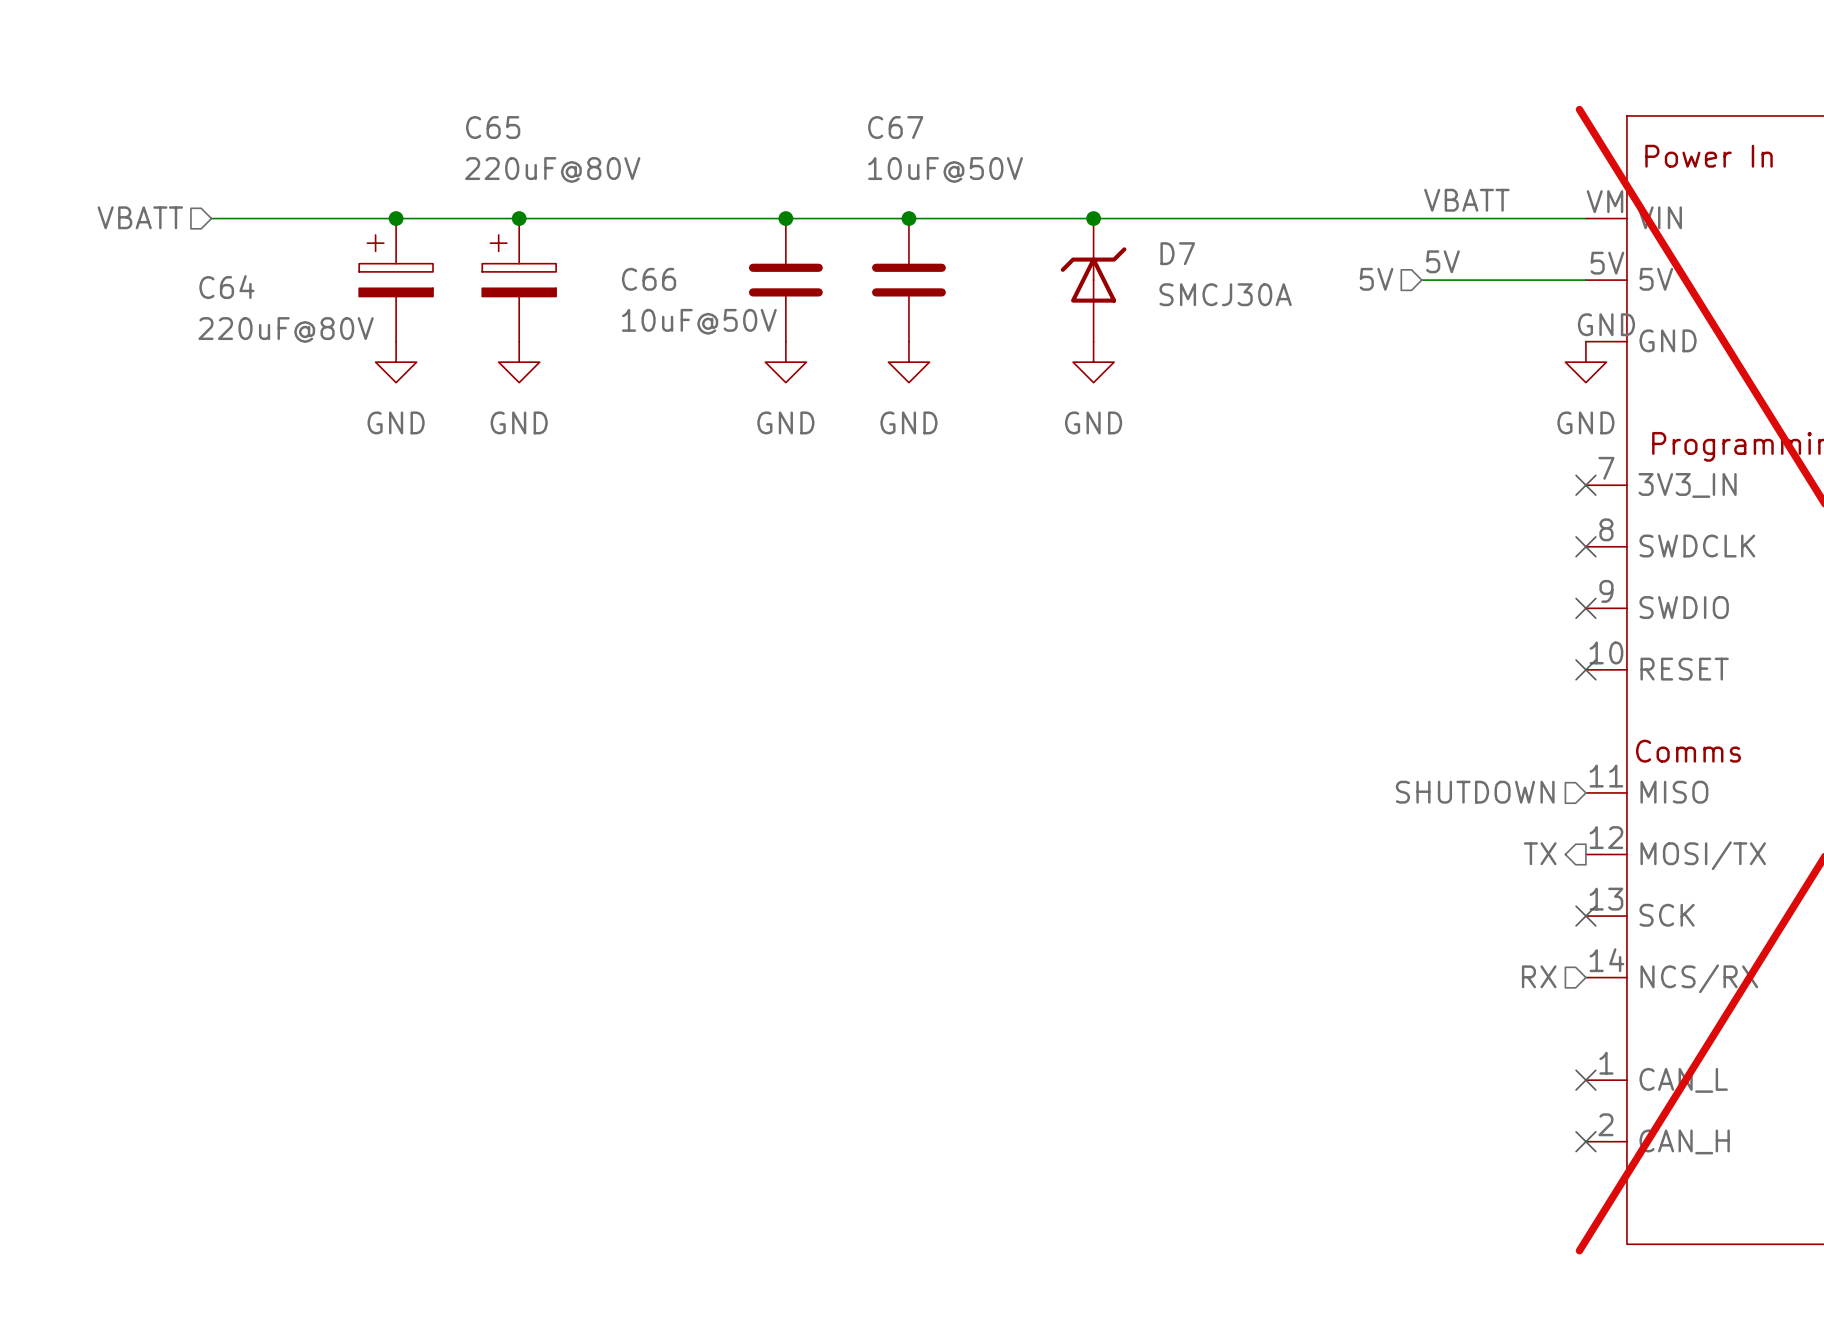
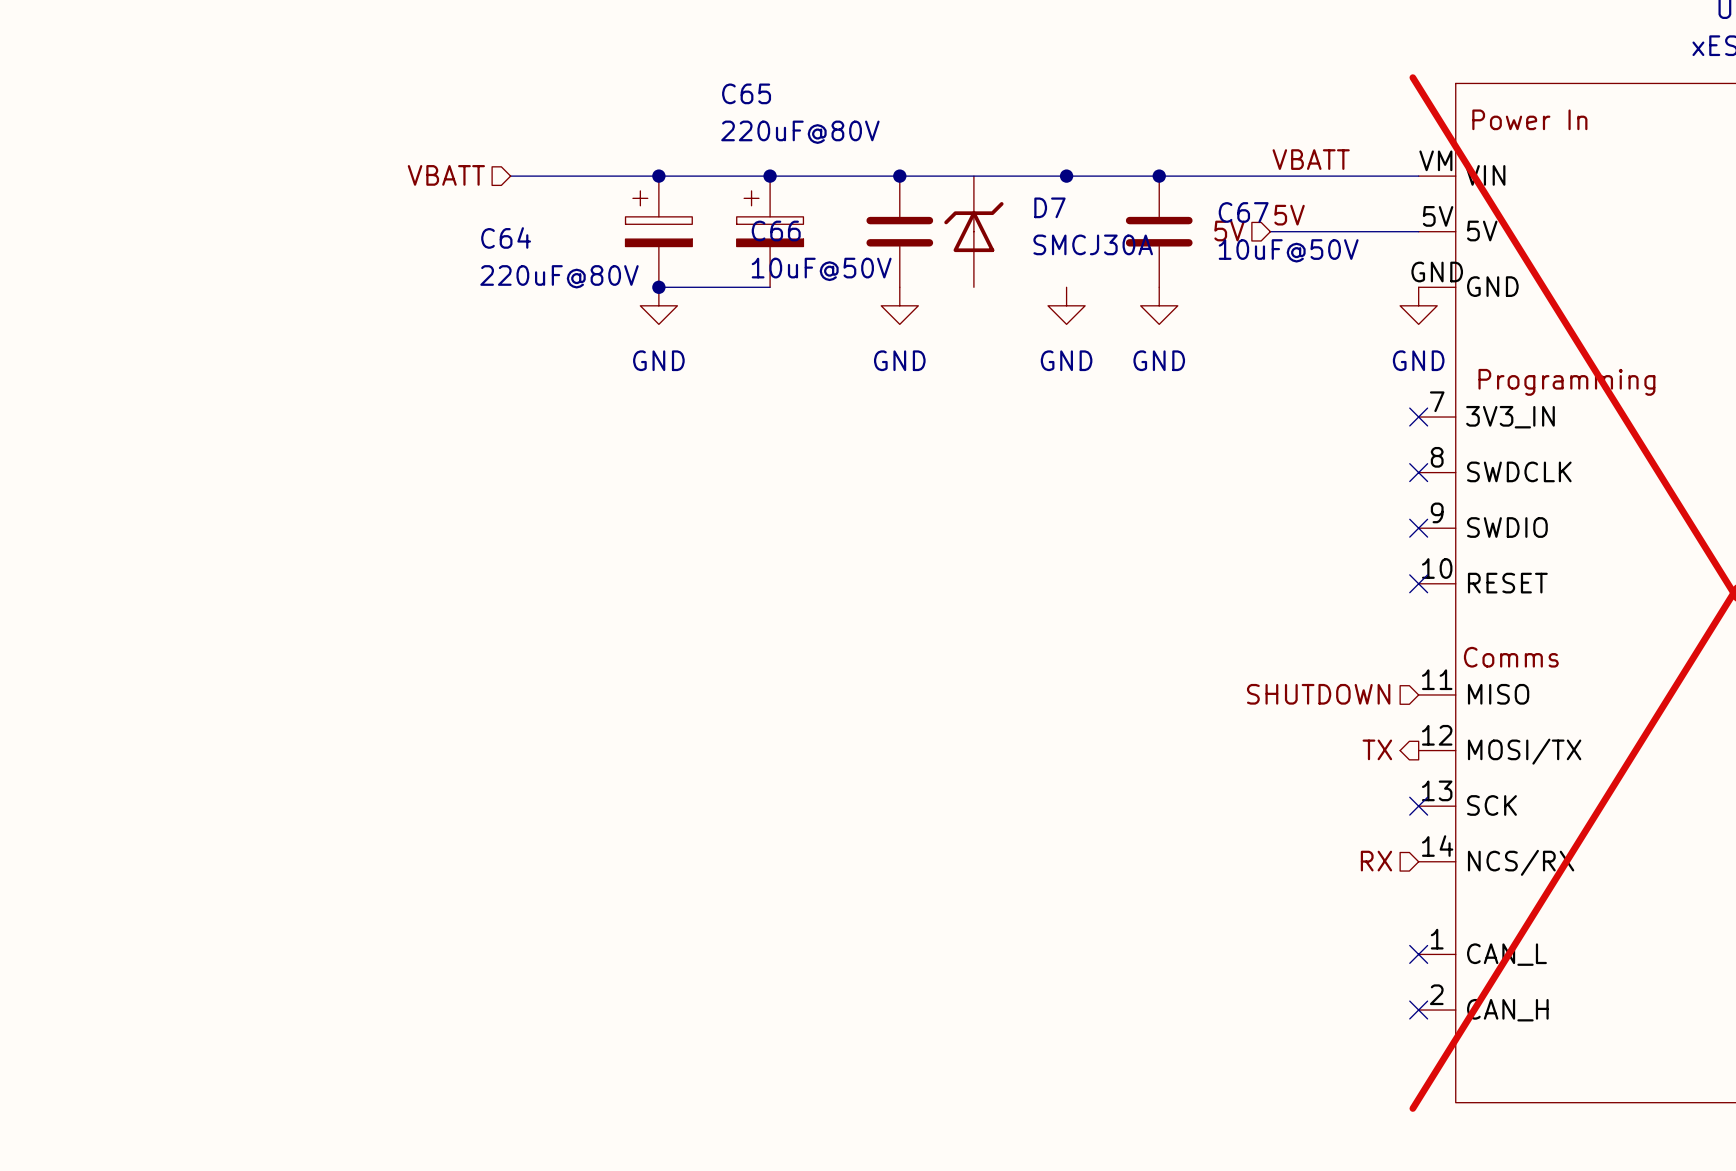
C67 name position: C67 (895, 127) -> C67 (1243, 212)
C67 value position: 10uF@50V (945, 170) -> 10uF@50V (1288, 250)
hierarchical label position: VBATT (140, 217) -> VBATT (446, 175)
wire: (211, 218) (580, 218) -> none
junction: (396, 218) -> none
junction: (519, 218) -> none
junction: none -> (658, 176)
junction: (785, 218) -> none
junction: none -> (770, 176)
junction: (908, 218) -> none
junction: none -> (899, 176)
junction: (1093, 218) -> none
junction: none -> (1066, 176)
junction: none -> (1159, 176)
C64 position: (396, 280) -> (658, 231)
C65 position: (519, 280) -> (770, 231)
C66 position: (785, 280) -> (899, 231)
C67 position: (908, 280) -> (1159, 231)
wire: none -> (658, 287) (770, 287)
junction: none -> (658, 287)
power symbol: GND (396, 362) -> none
power symbol: GND (519, 362) -> none
power symbol position: GND (785, 362) -> GND (658, 305)
power symbol: GND (908, 362) -> none
power symbol: none -> GND (899, 305)
power symbol: GND (1093, 362) -> none
power symbol: none -> GND (1066, 305)
power symbol: none -> GND (1159, 305)

